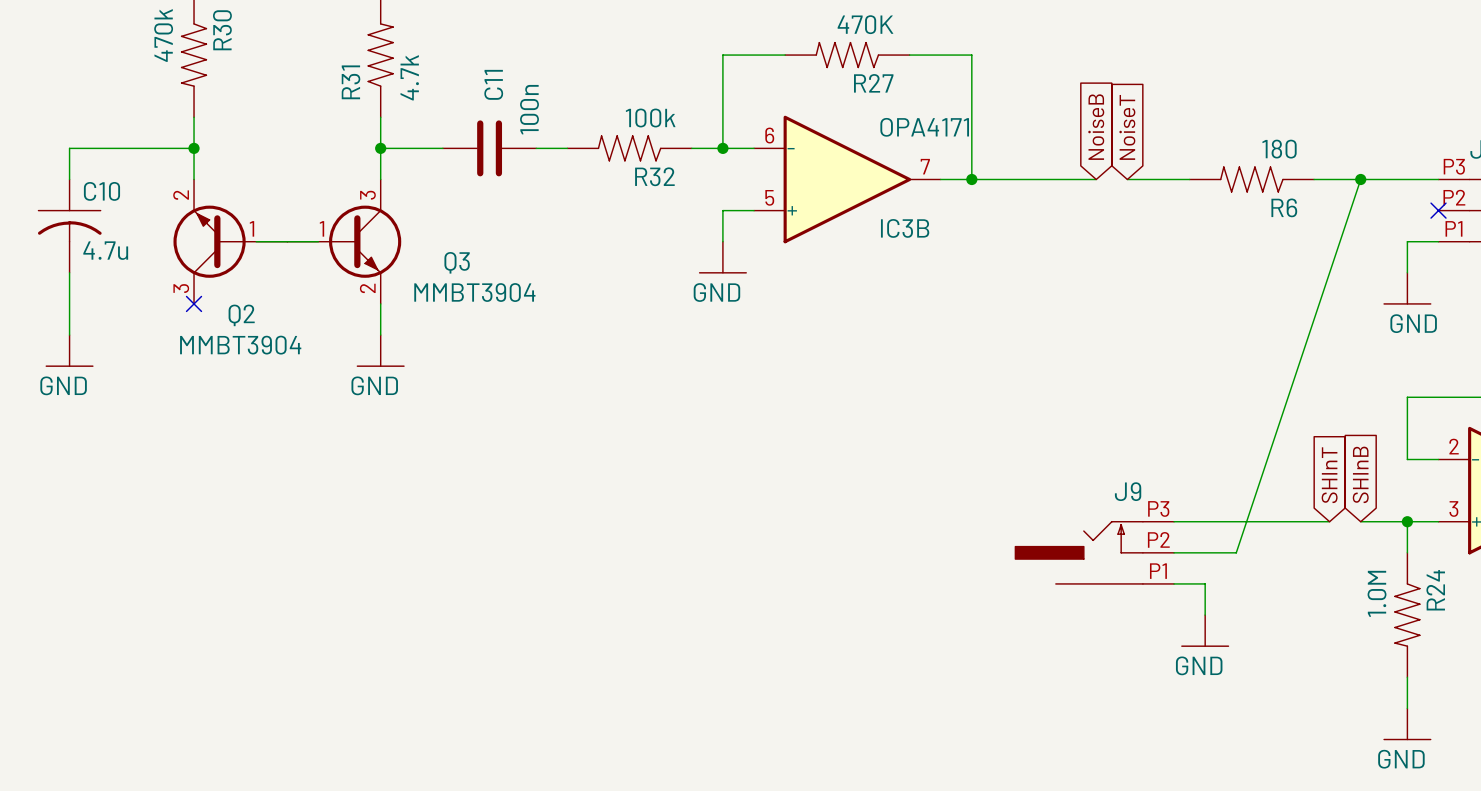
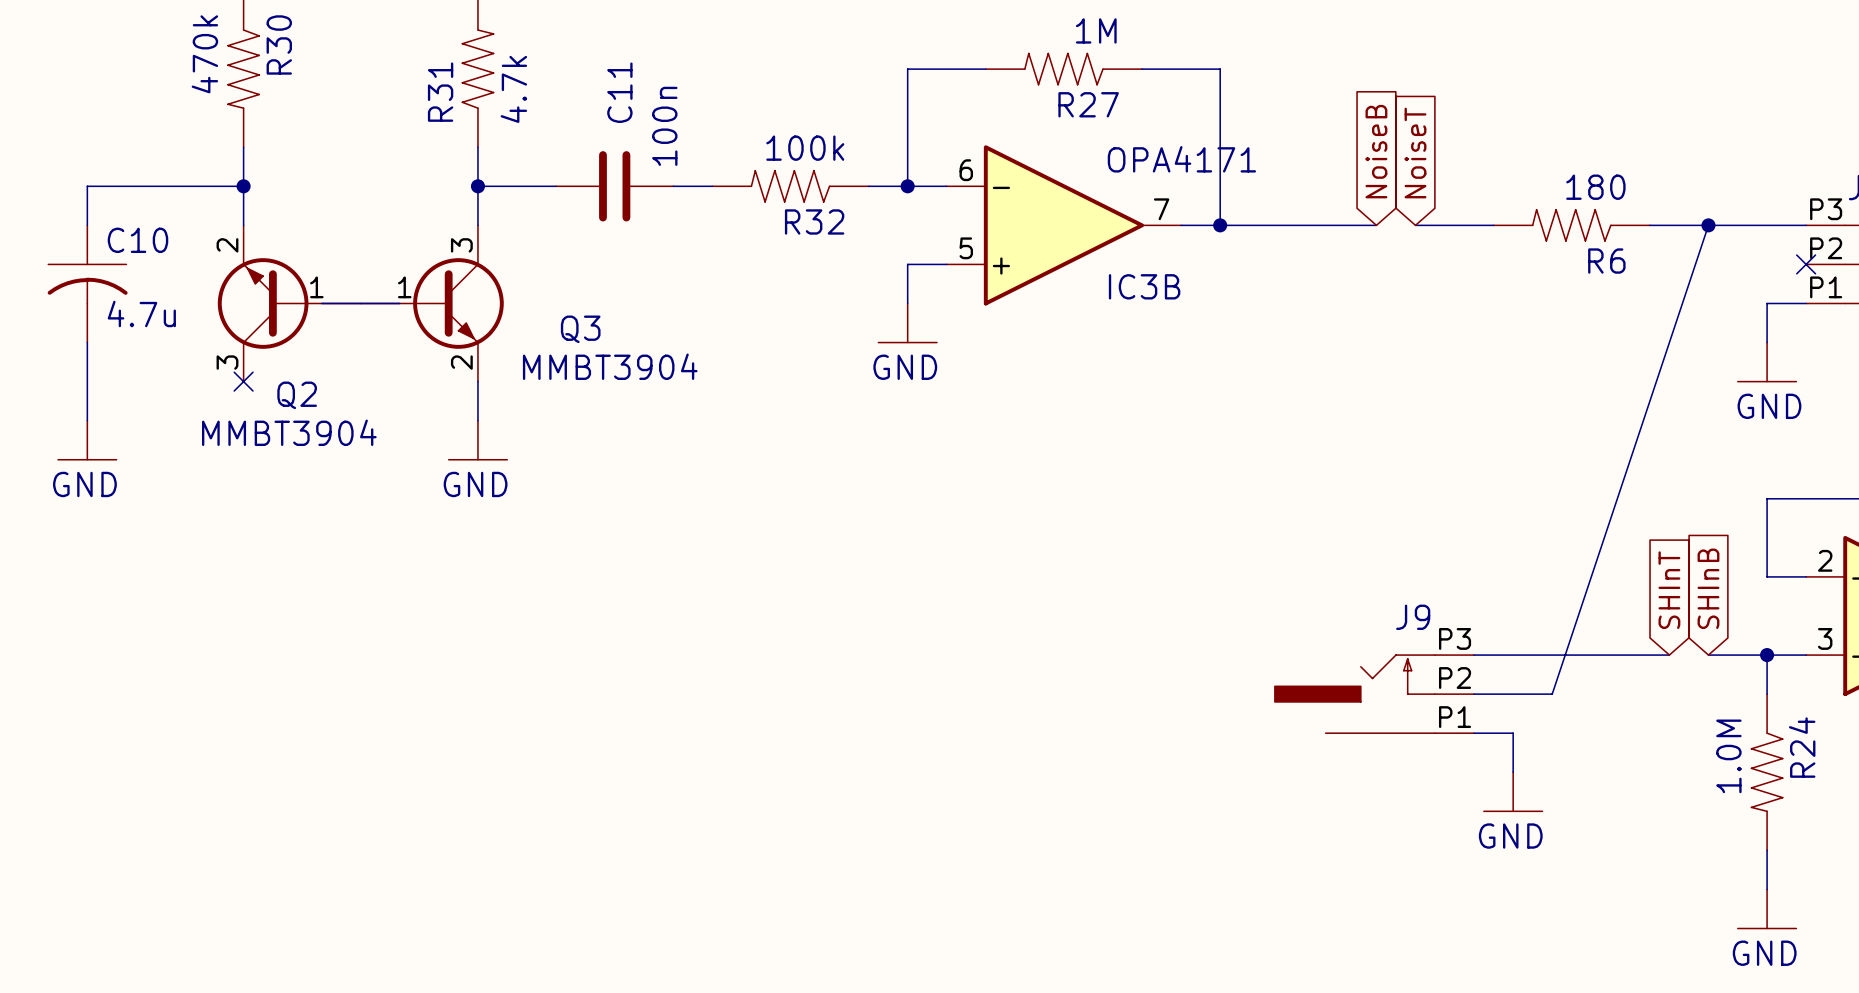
R27 value: 470K (865, 24) -> 1M (1096, 30)

